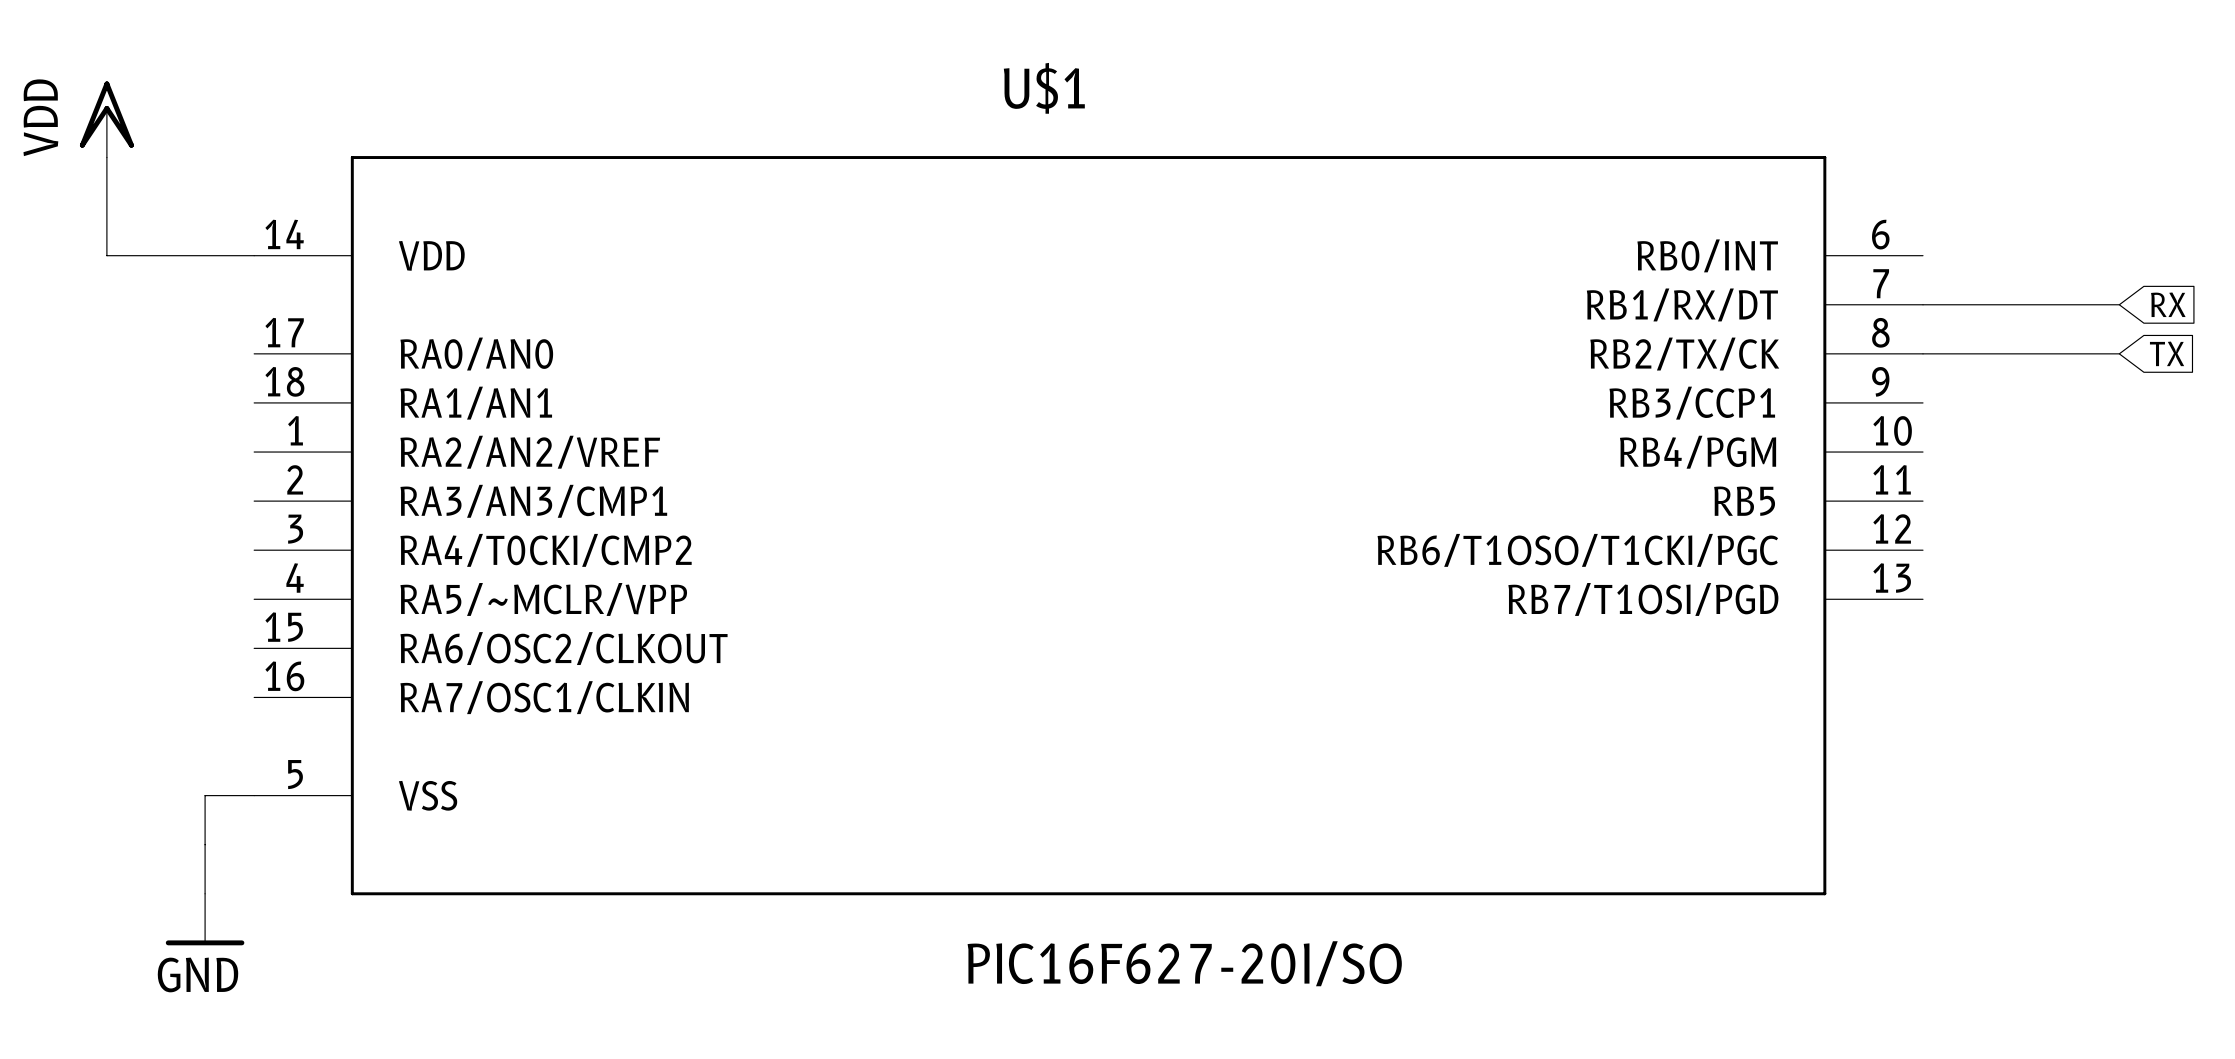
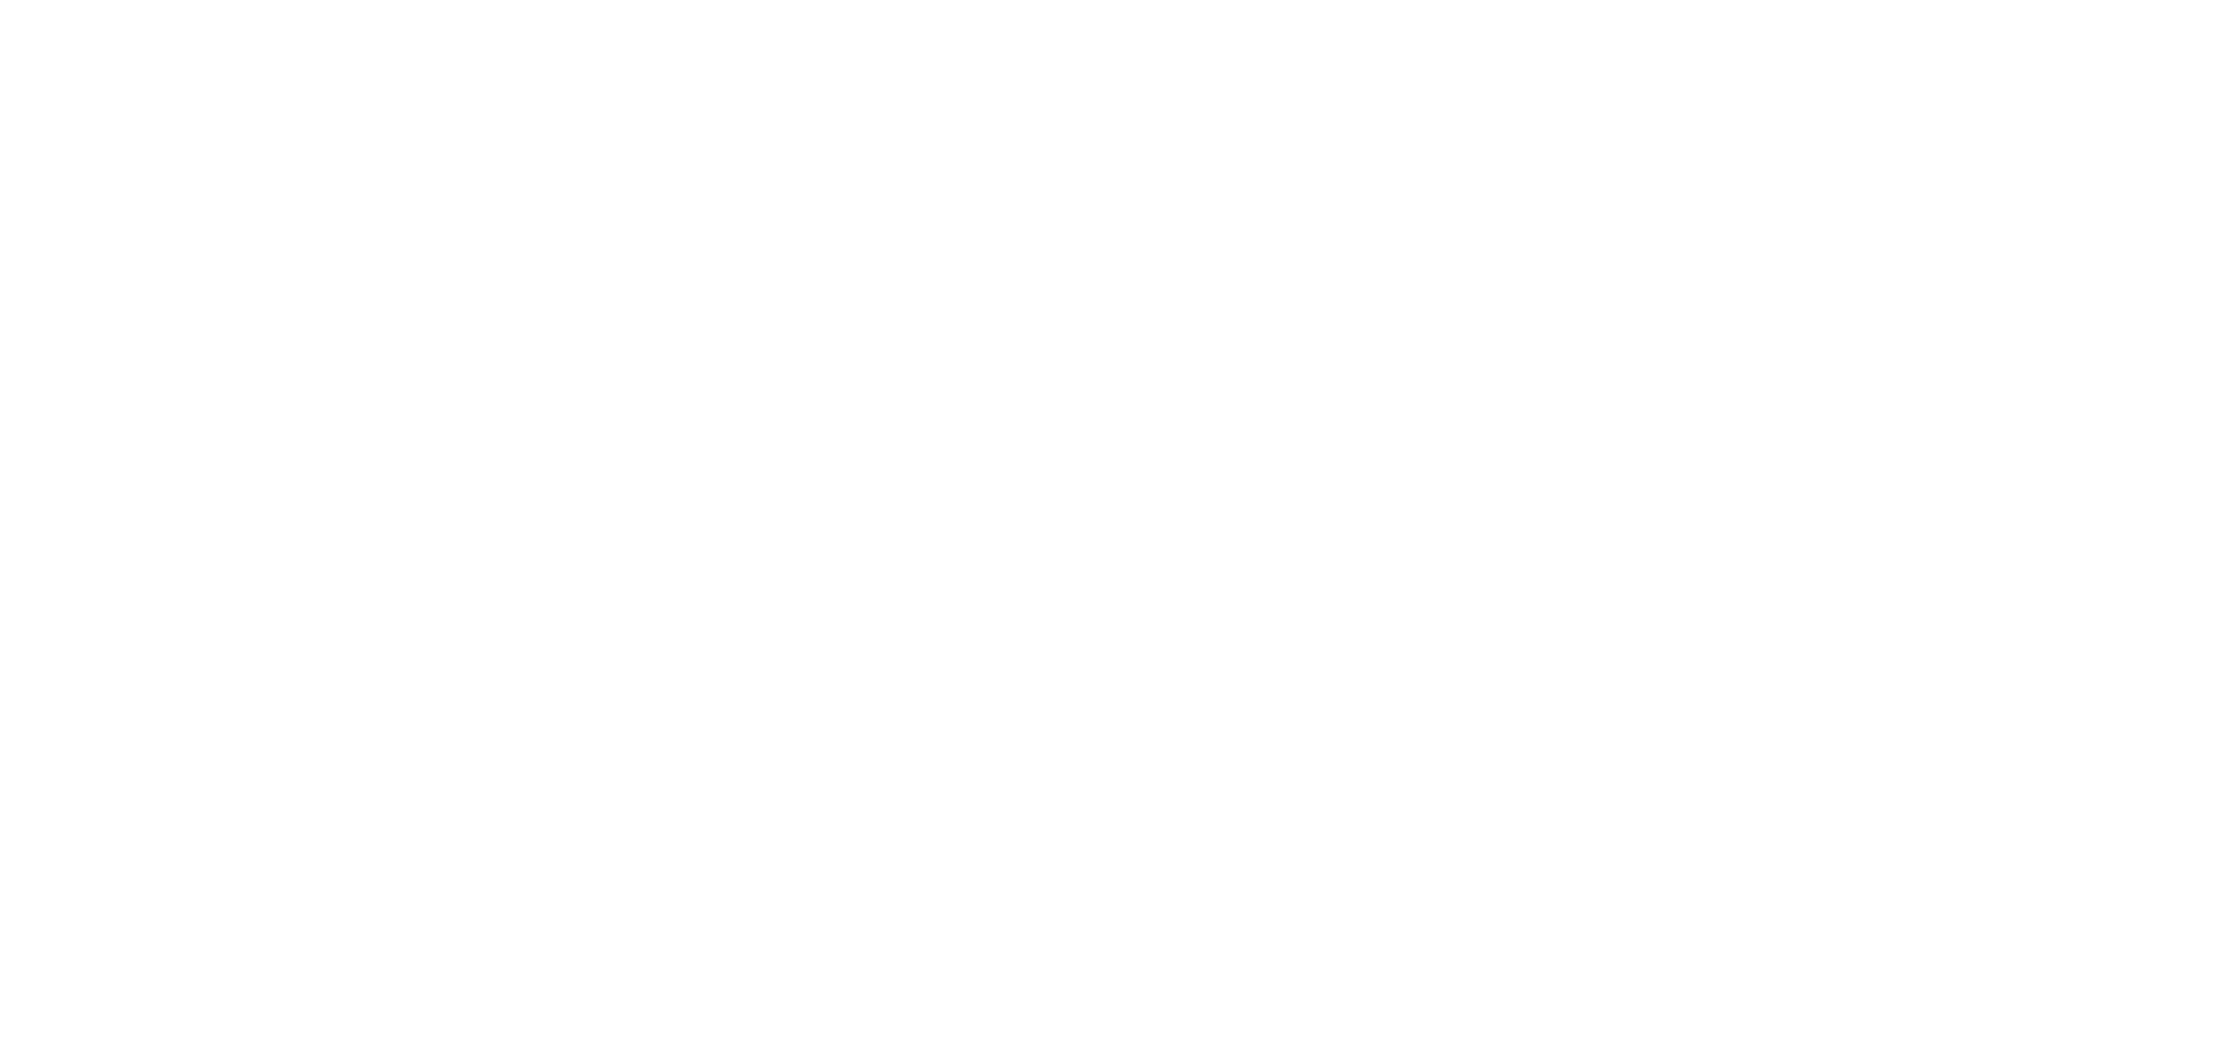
power symbol: VDD (106, 119) -> none
wire: (106, 157) (106, 255) (254, 255) -> none
wire: (1923, 304) (2119, 304) -> none
global label: RX (2168, 304) -> none
wire: (1923, 353) (2119, 353) -> none
global label: TX (2167, 353) -> none
U$1: PIC16F627-20I/SO (1088, 525) -> none
wire: (254, 795) (205, 795) (205, 893) -> none
power symbol: GND (205, 919) -> none

